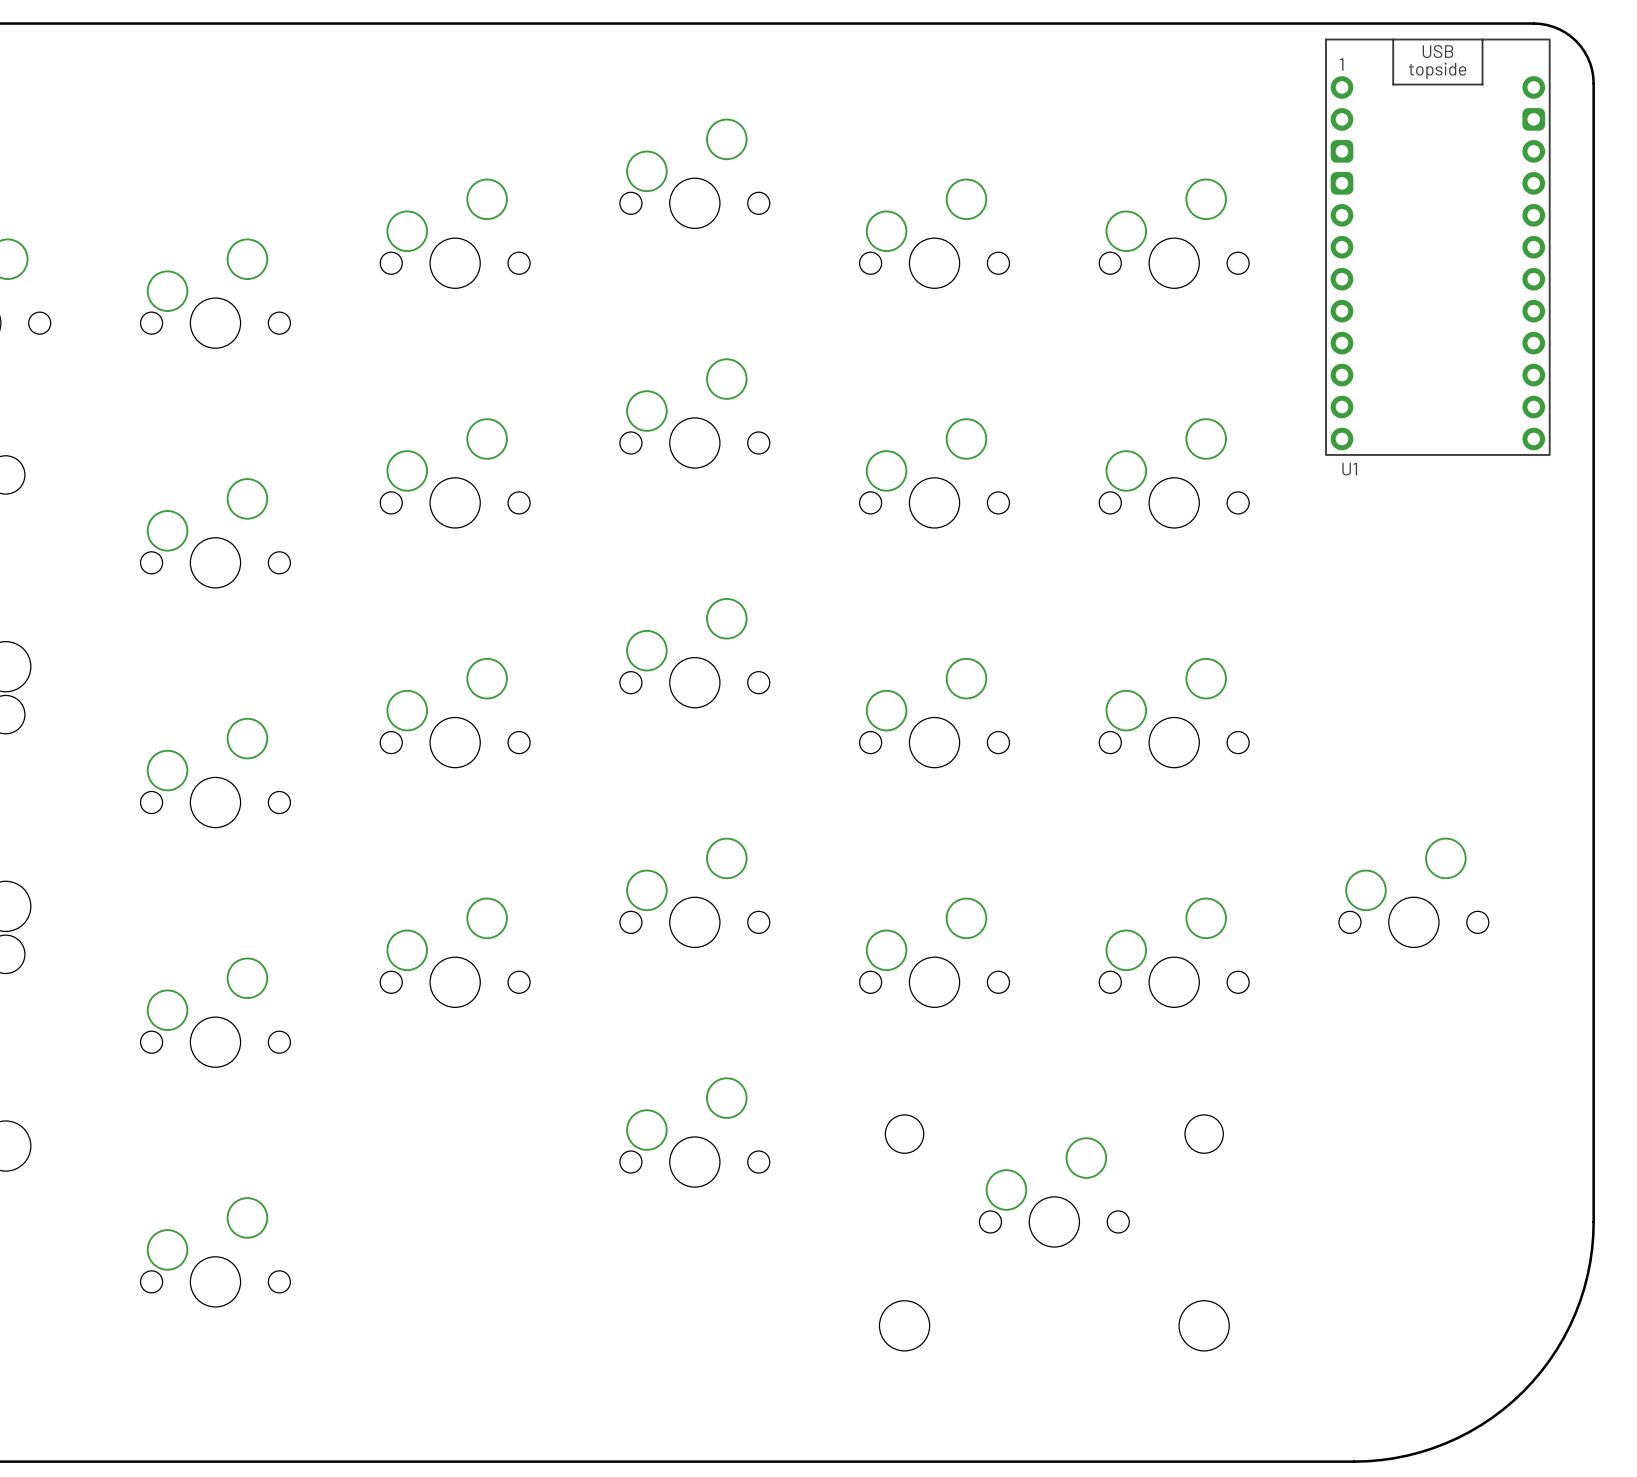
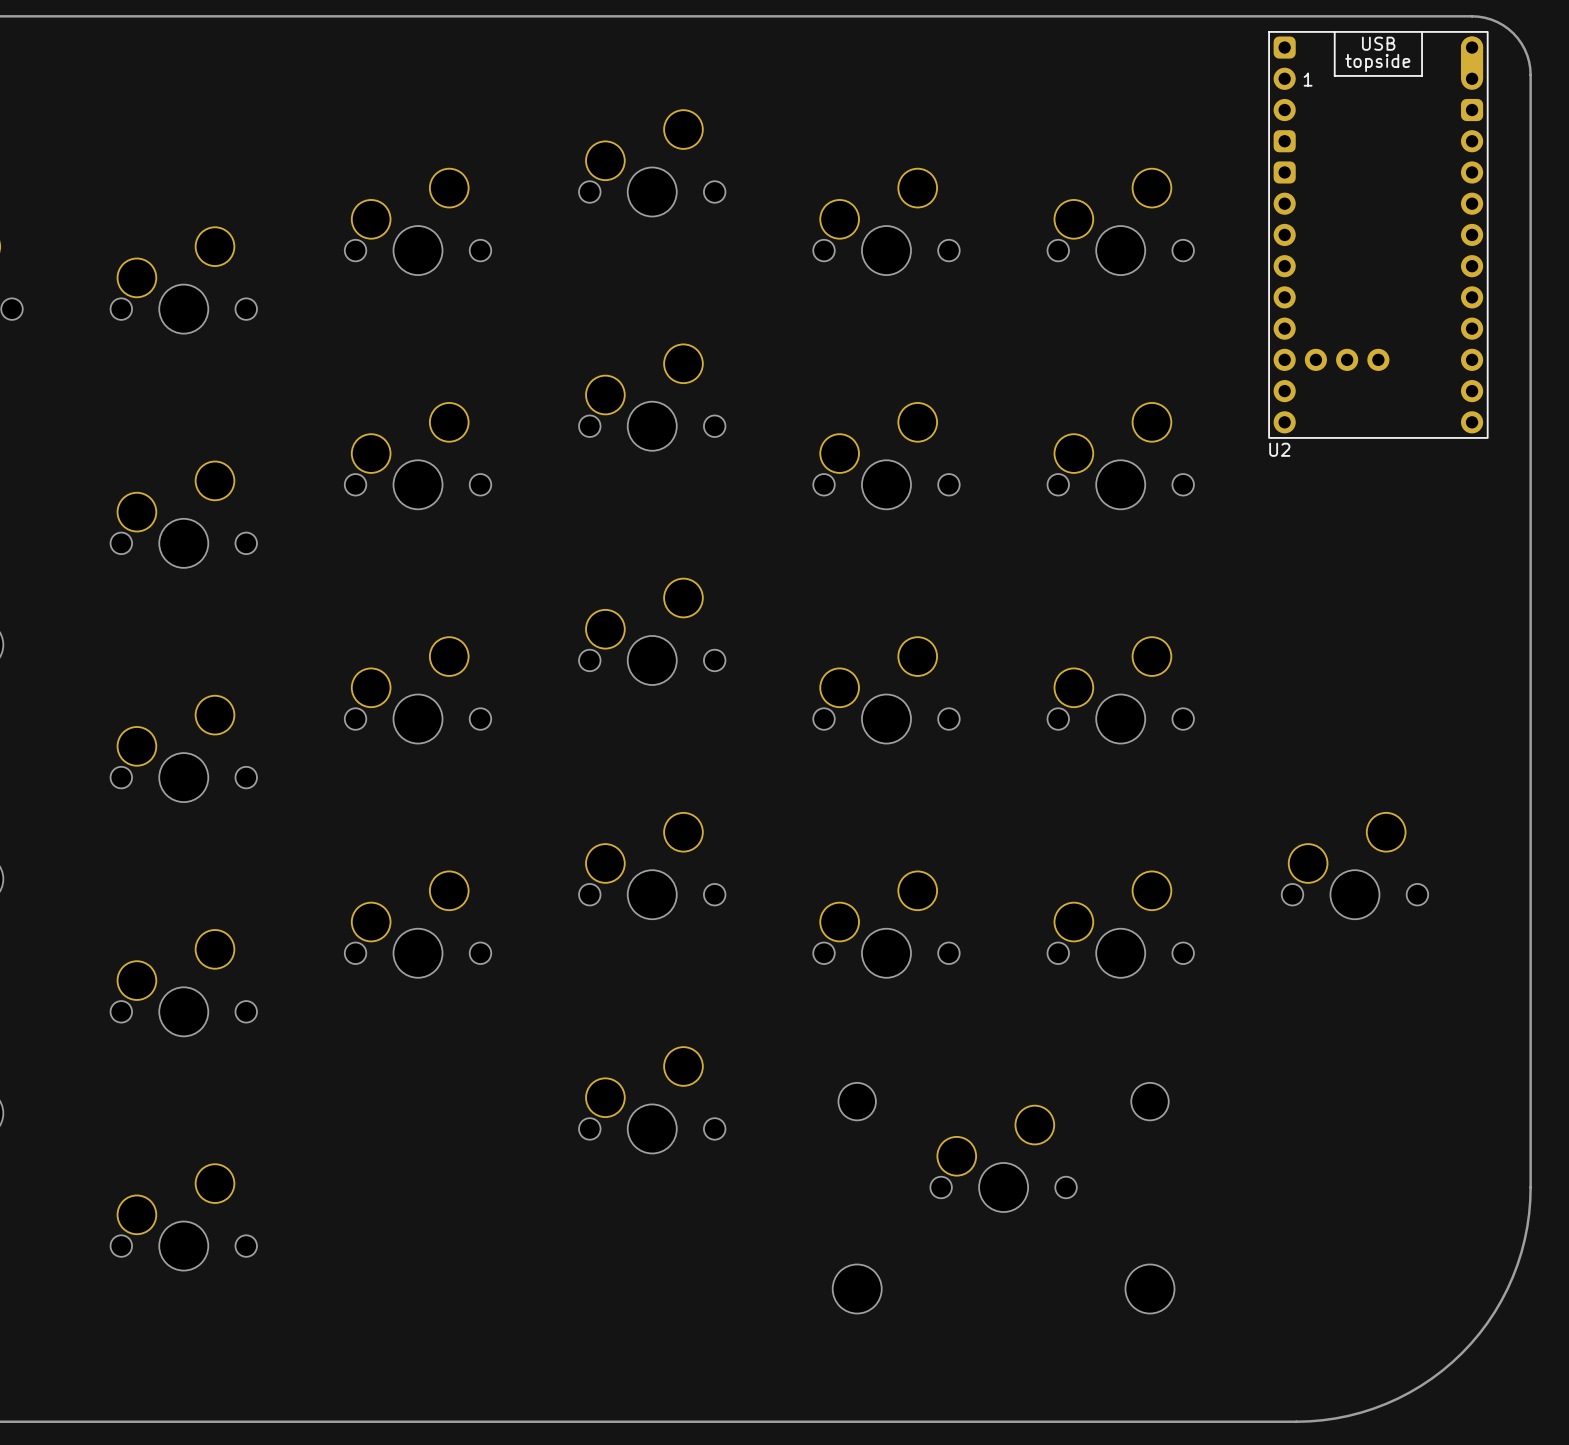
U1: (1437, 247) -> none
U2: none -> (1378, 234)

